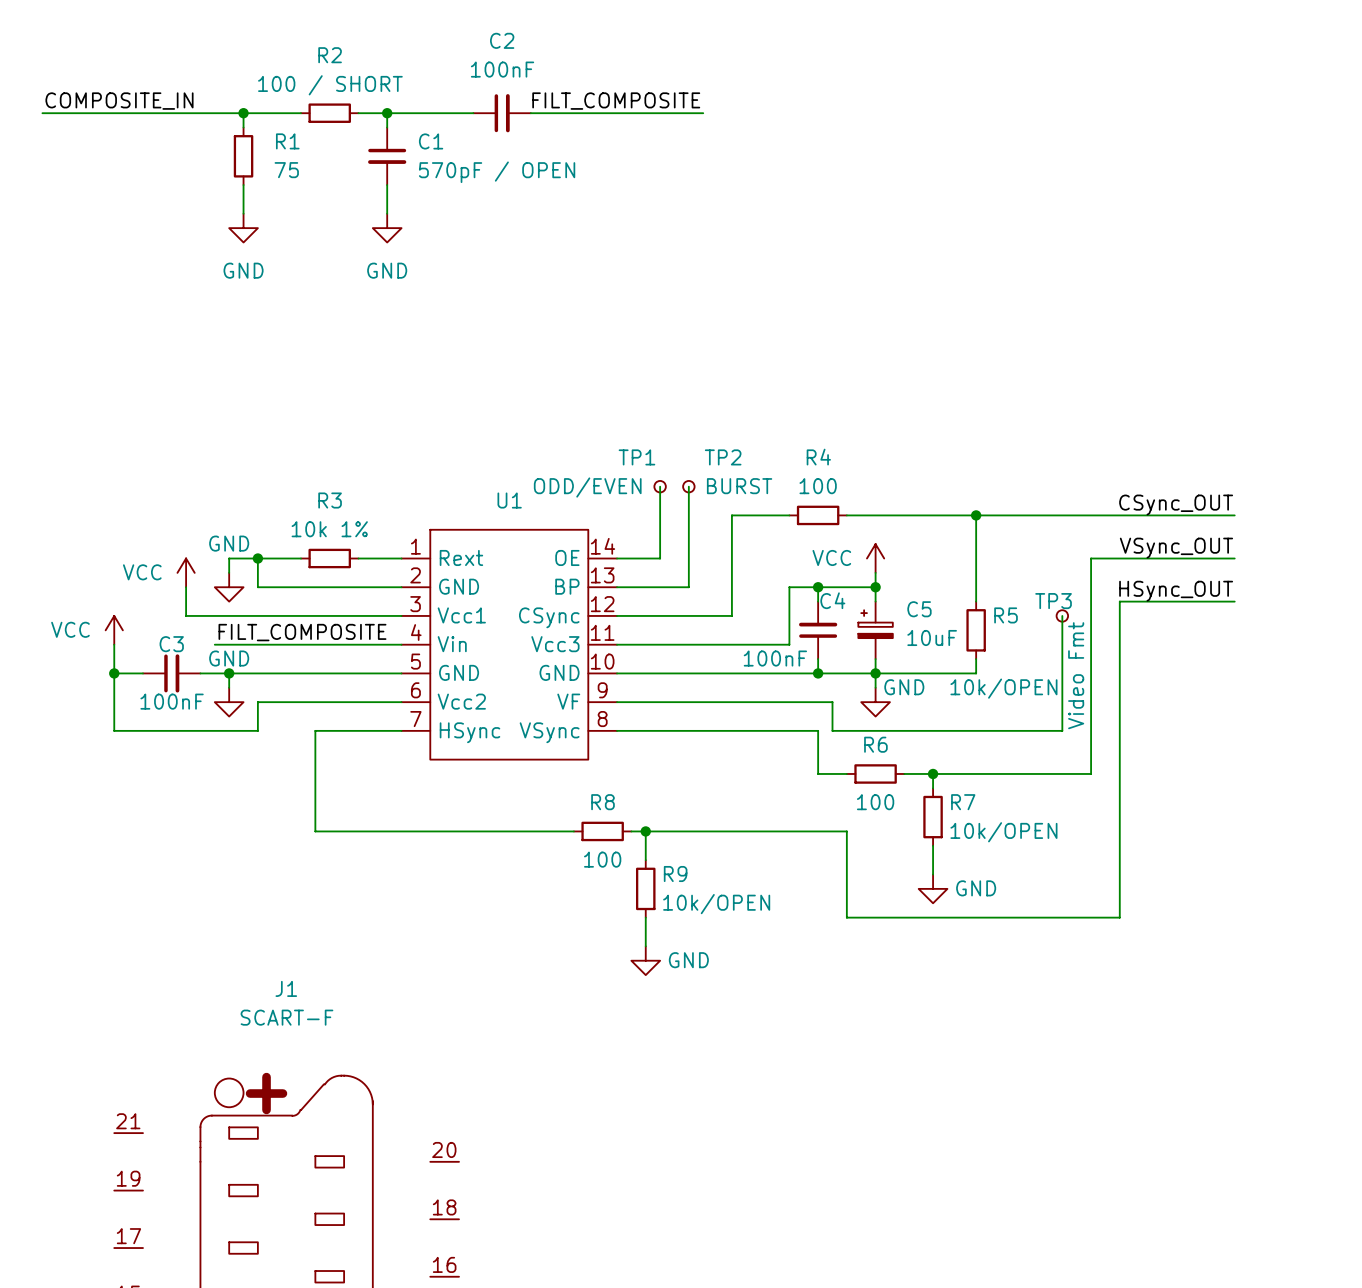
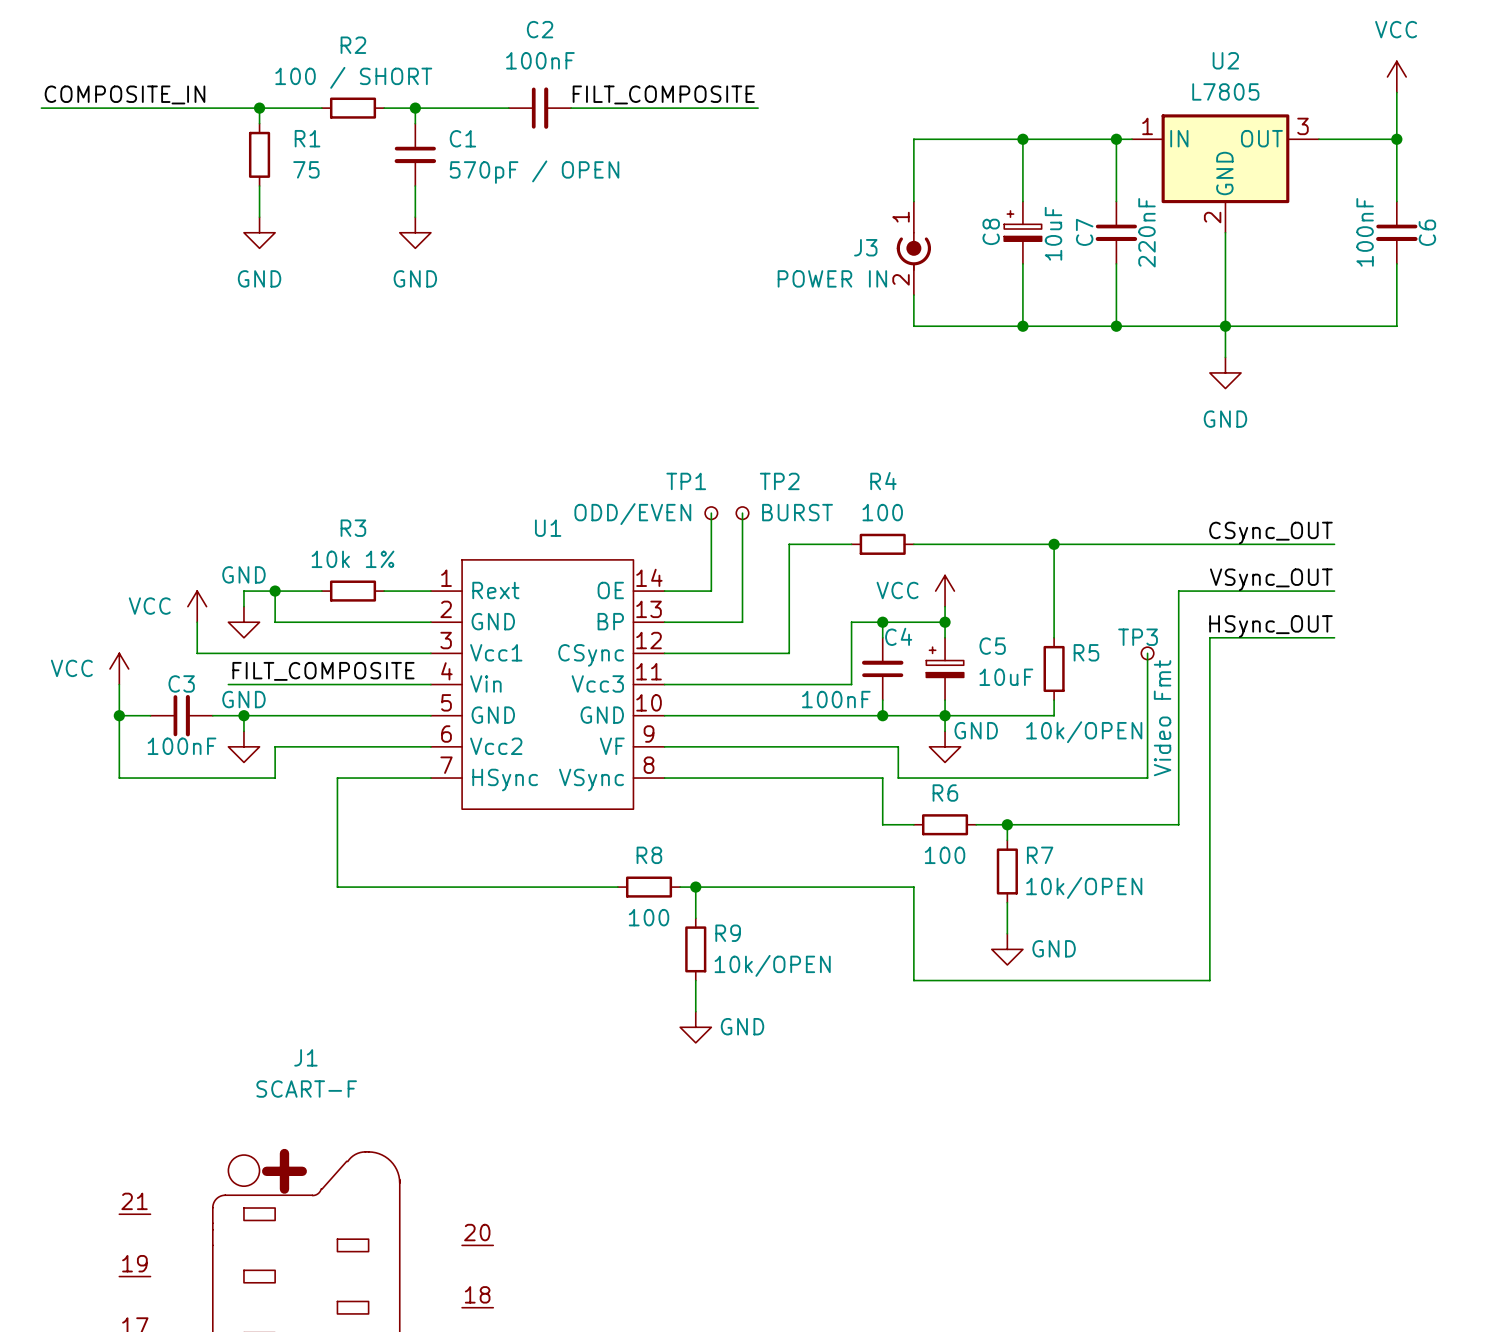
power symbol: none -> VCC (1396, 76)
wire: none -> (1396, 92) (1396, 201)
wire: none -> (1022, 139) (1022, 201)
junction: none -> (1022, 139)
wire: none -> (1116, 139) (1116, 201)
junction: none -> (1116, 139)
wire: none -> (1131, 139) (913, 139) (913, 201)
wire: none -> (1318, 139) (1396, 139)
junction: none -> (1396, 139)
U2: none -> L7805 (1225, 173)
C8: none -> 10uF (1022, 232)
C7: none -> 220nF (1116, 232)
wire: none -> (1225, 232) (1225, 357)
C6: none -> 100nF (1396, 232)
J3: none -> POWER IN (913, 248)
wire: none -> (1022, 263) (1022, 326)
wire: none -> (1116, 263) (1116, 326)
wire: none -> (1396, 263) (1396, 326) (913, 326) (913, 295)
junction: none -> (1022, 326)
junction: none -> (1116, 326)
junction: none -> (1225, 326)
power symbol: none -> GND (1225, 372)

